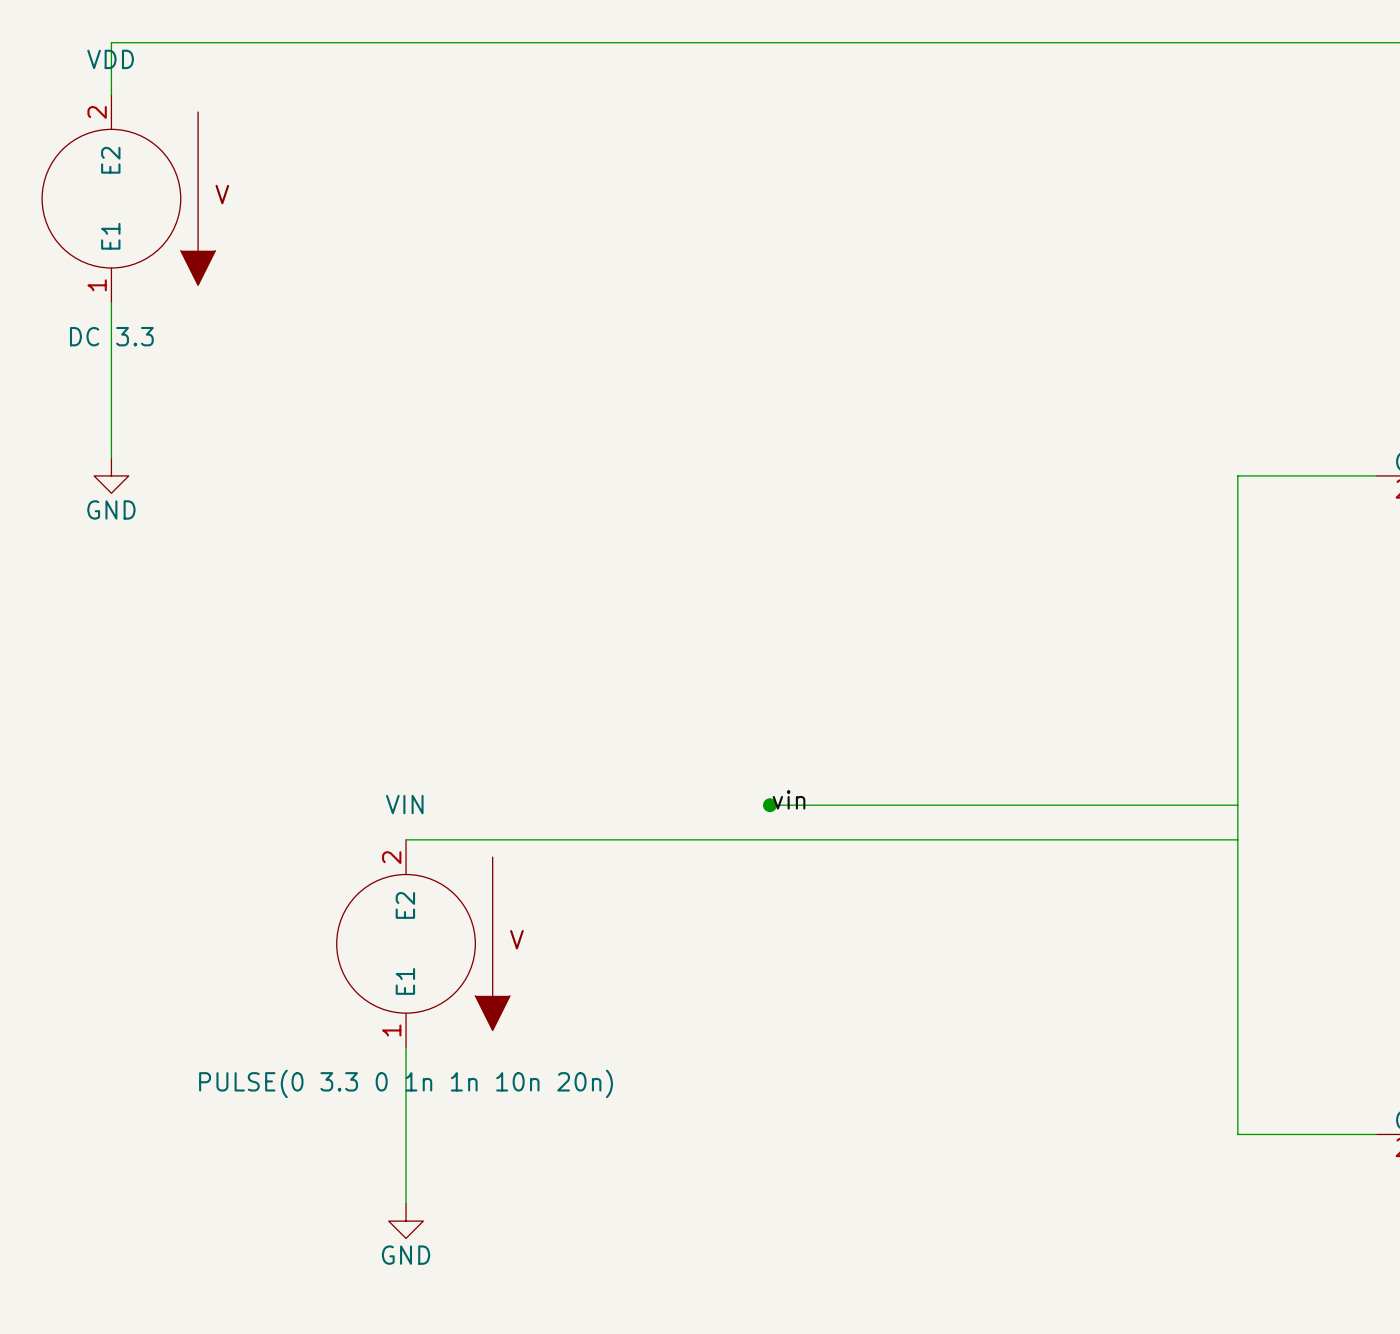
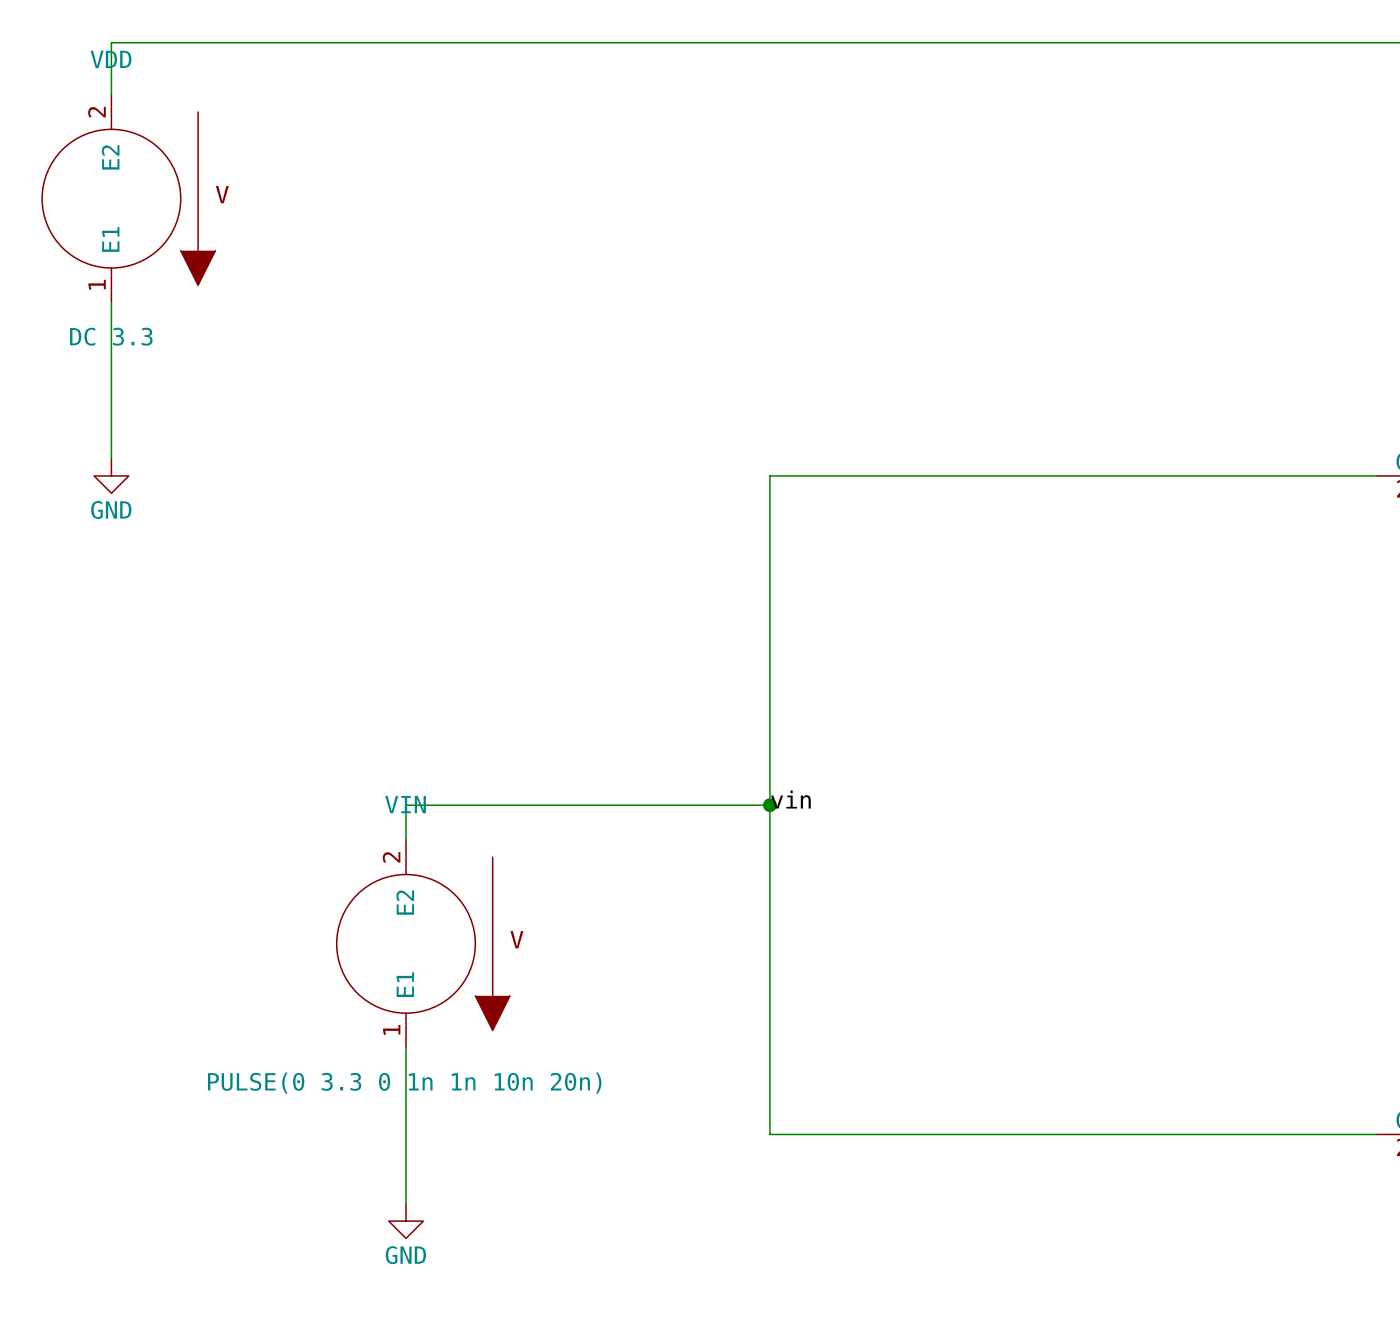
wire: (1237, 475) (1237, 1134) -> (1237, 475) (769, 475) (769, 1134) (1237, 1134)
wire: (769, 805) (1237, 805) -> none
wire: (406, 839) (1237, 839) -> (406, 839) (406, 805) (769, 805)

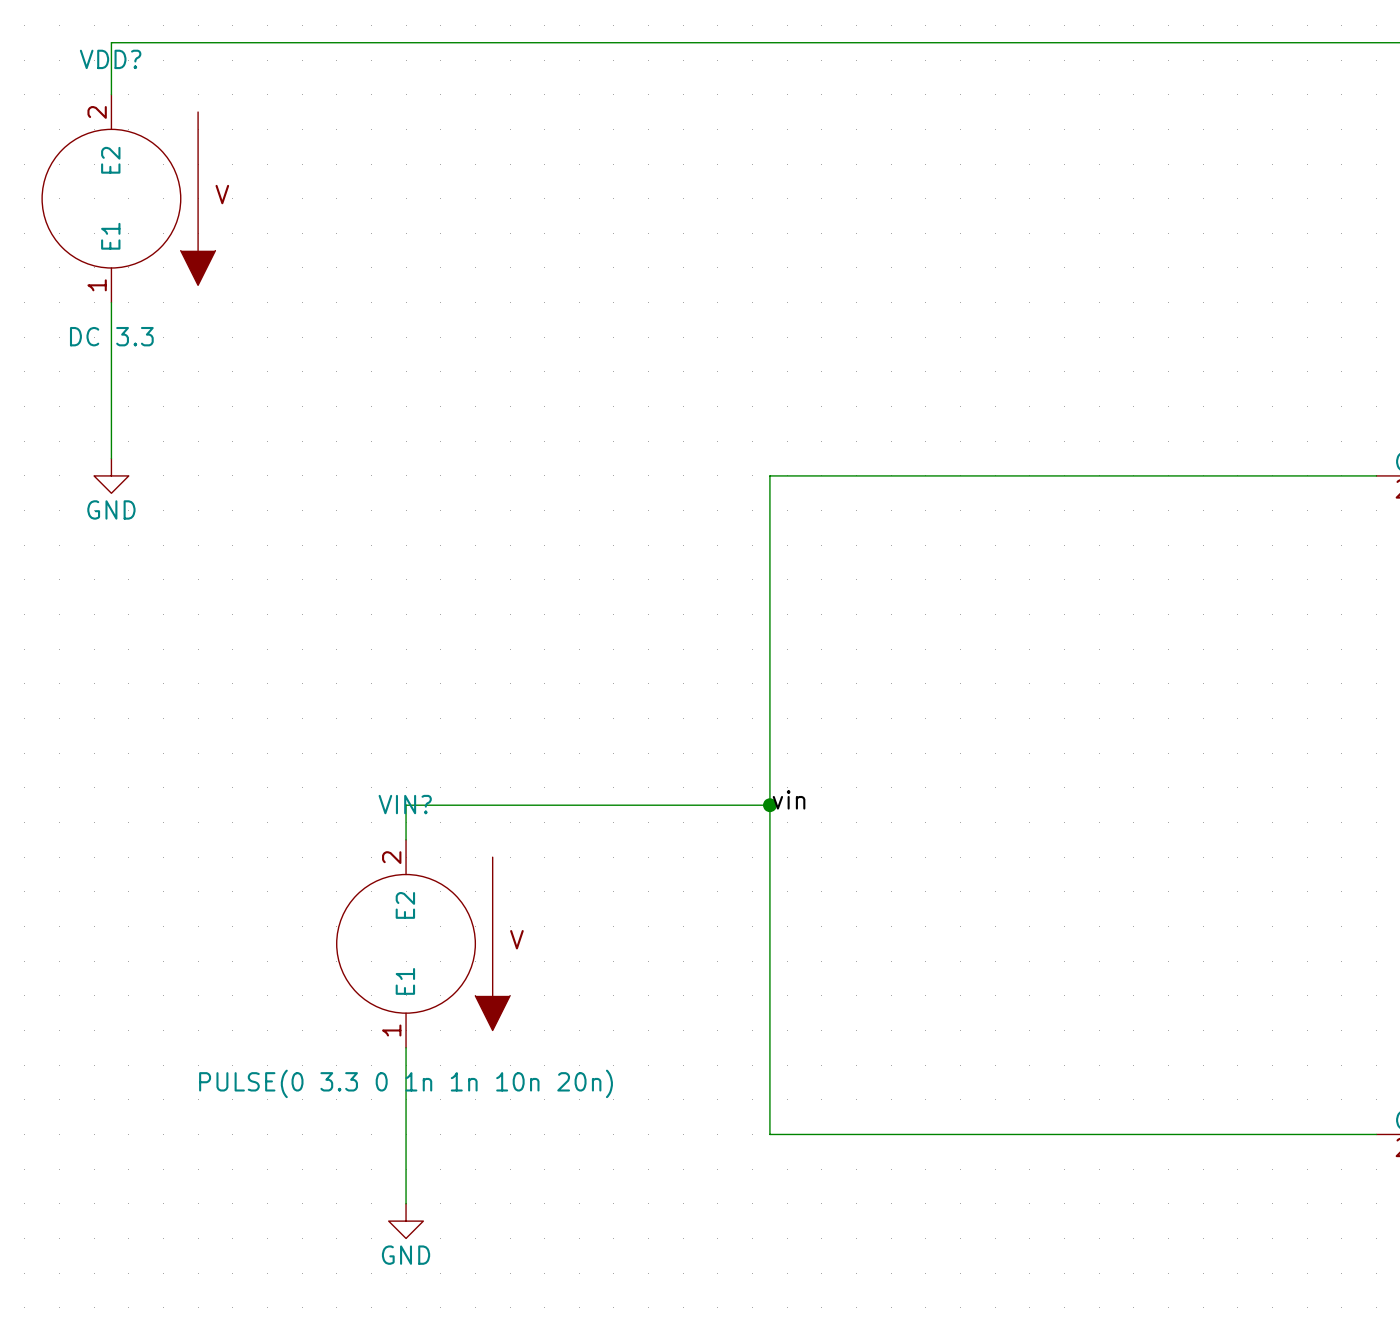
VDD name: VDD (111, 59) -> VDD? (110, 59)
VIN name: VIN (405, 804) -> VIN? (405, 804)

